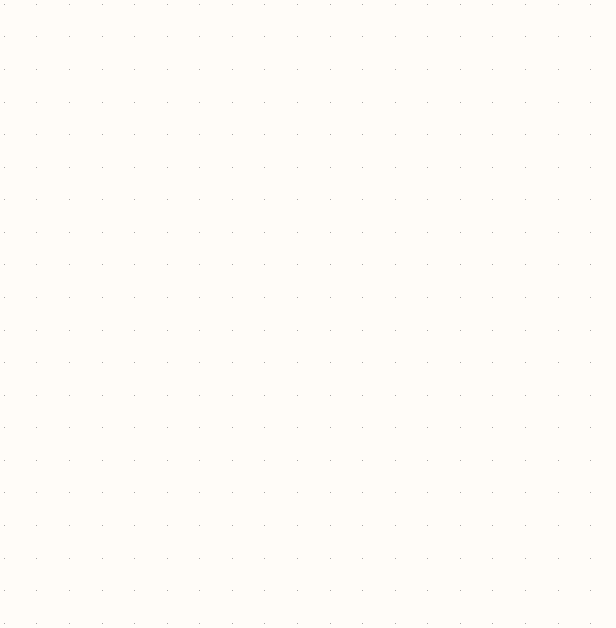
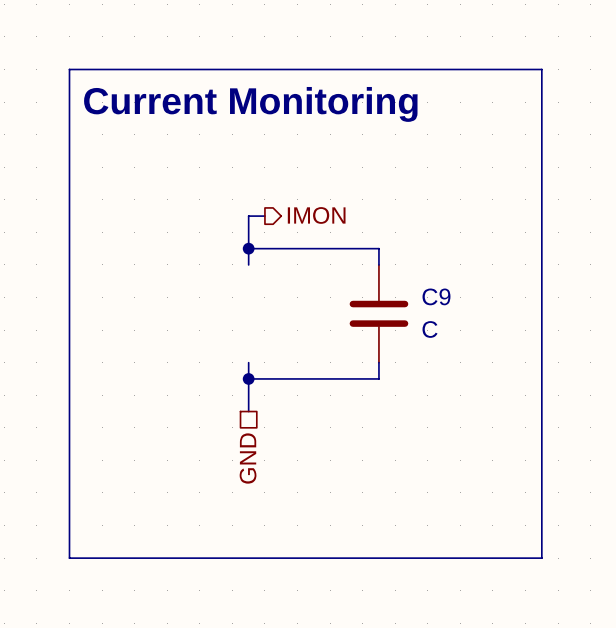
line: none -> (69, 69) (541, 69) (541, 558) (69, 558) (69, 69)
text: none -> Current Monitoring (250, 104)
hierarchical label: none -> IMON (316, 215)
wire: none -> (264, 216) (248, 216) (248, 264)
wire: none -> (248, 248) (378, 248) (378, 264)
junction: none -> (248, 248)
C9: none -> C (378, 313)
wire: none -> (248, 362) (248, 411)
wire: none -> (378, 362) (378, 378) (248, 378)
junction: none -> (248, 378)
hierarchical label: none -> GND (248, 458)

